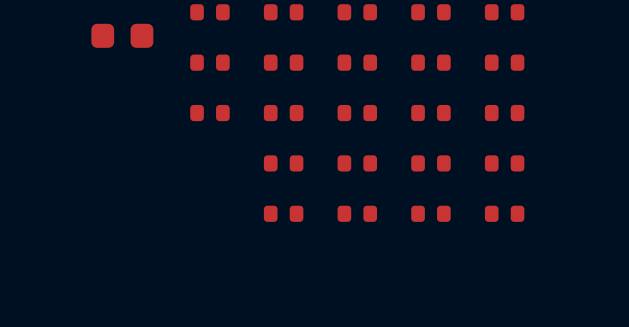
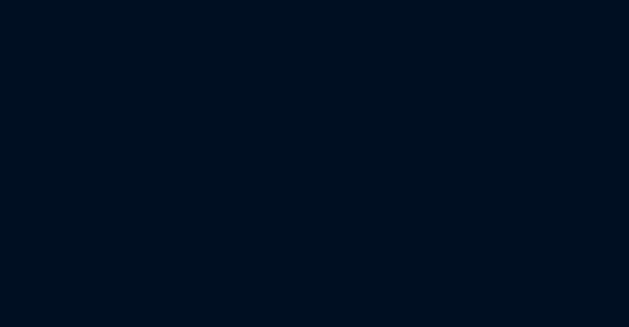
part: (209, 12) -> none
part: (283, 12) -> none
part: (357, 12) -> none
part: (430, 12) -> none
part: (504, 12) -> none
part: (122, 35) -> none
part: (209, 62) -> none
part: (283, 62) -> none
part: (357, 62) -> none
part: (430, 62) -> none
part: (504, 62) -> none
part: (209, 113) -> none
part: (283, 113) -> none
part: (357, 113) -> none
part: (430, 113) -> none
part: (504, 113) -> none
part: (283, 163) -> none
part: (357, 163) -> none
part: (430, 163) -> none
part: (504, 163) -> none
part: (283, 213) -> none
part: (357, 213) -> none
part: (430, 213) -> none
part: (504, 213) -> none

